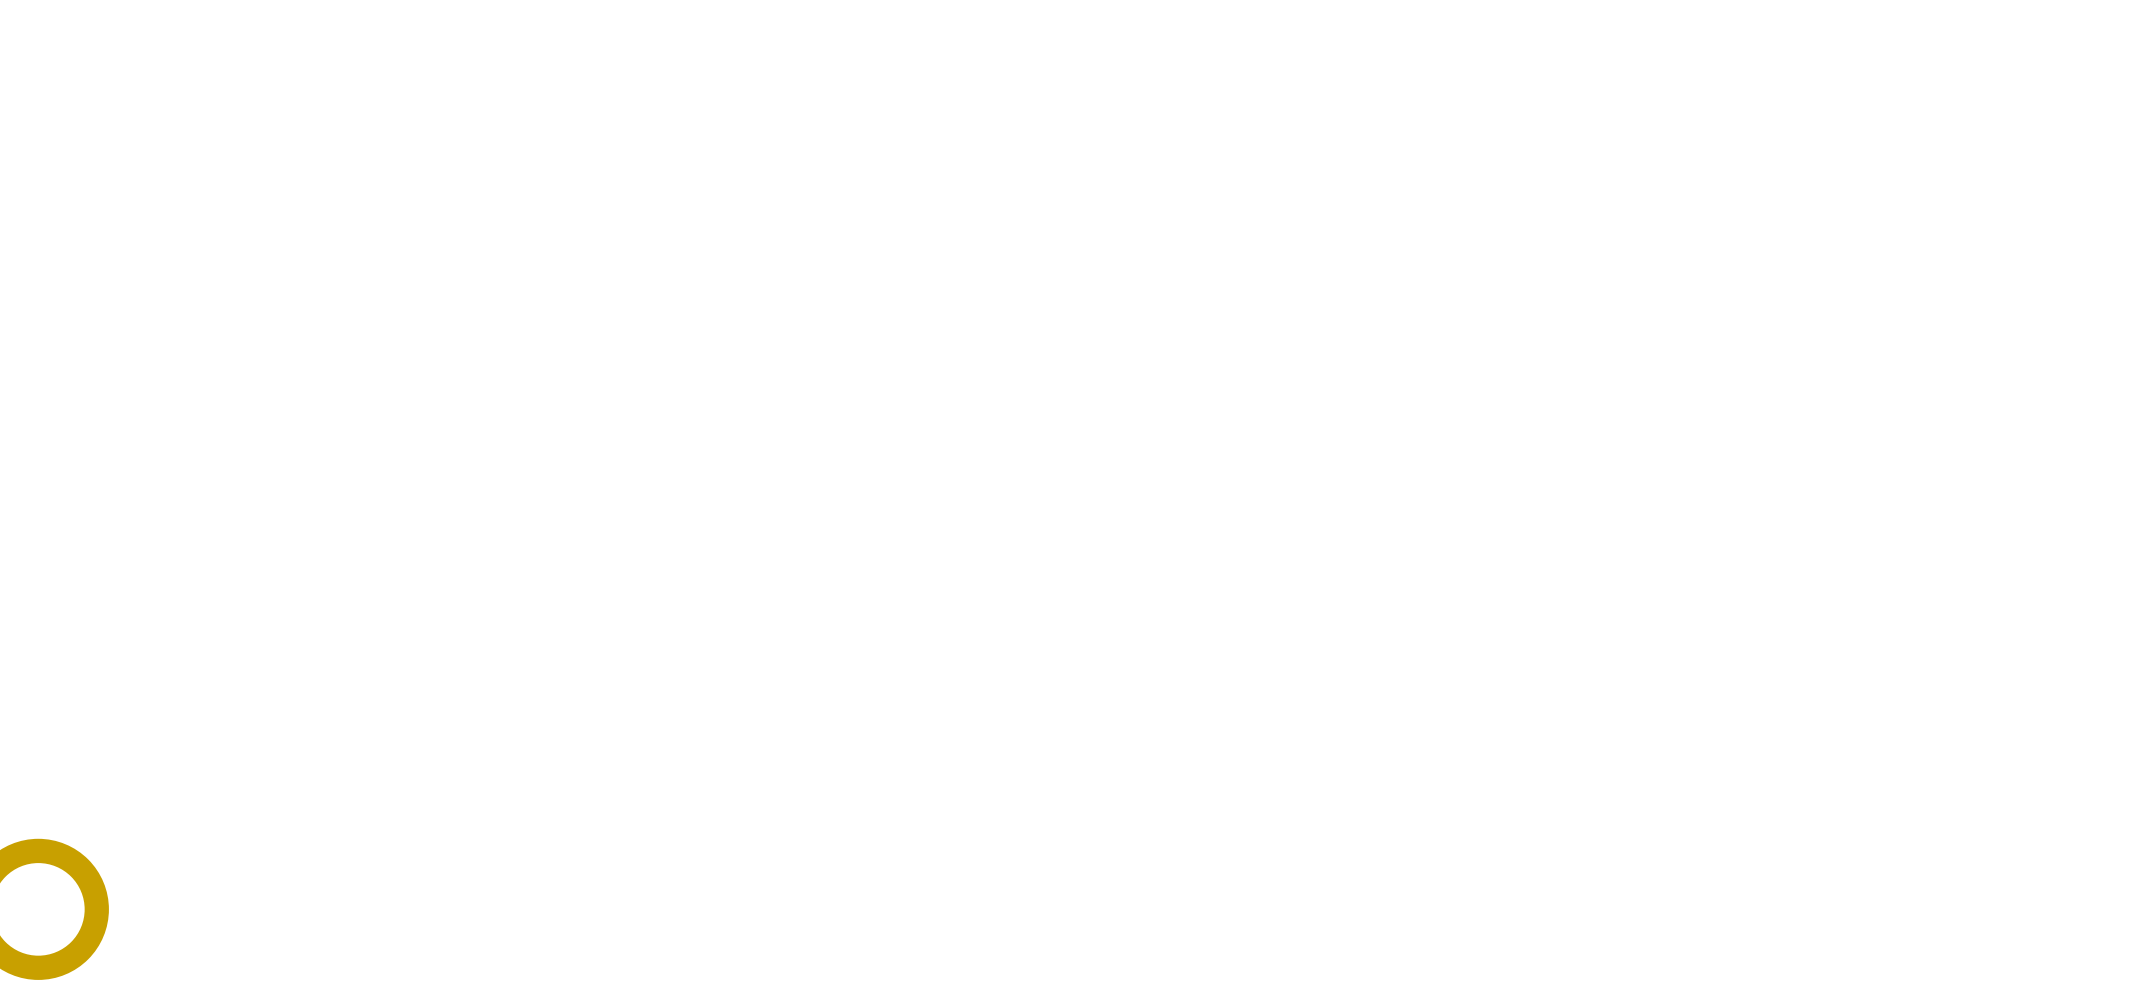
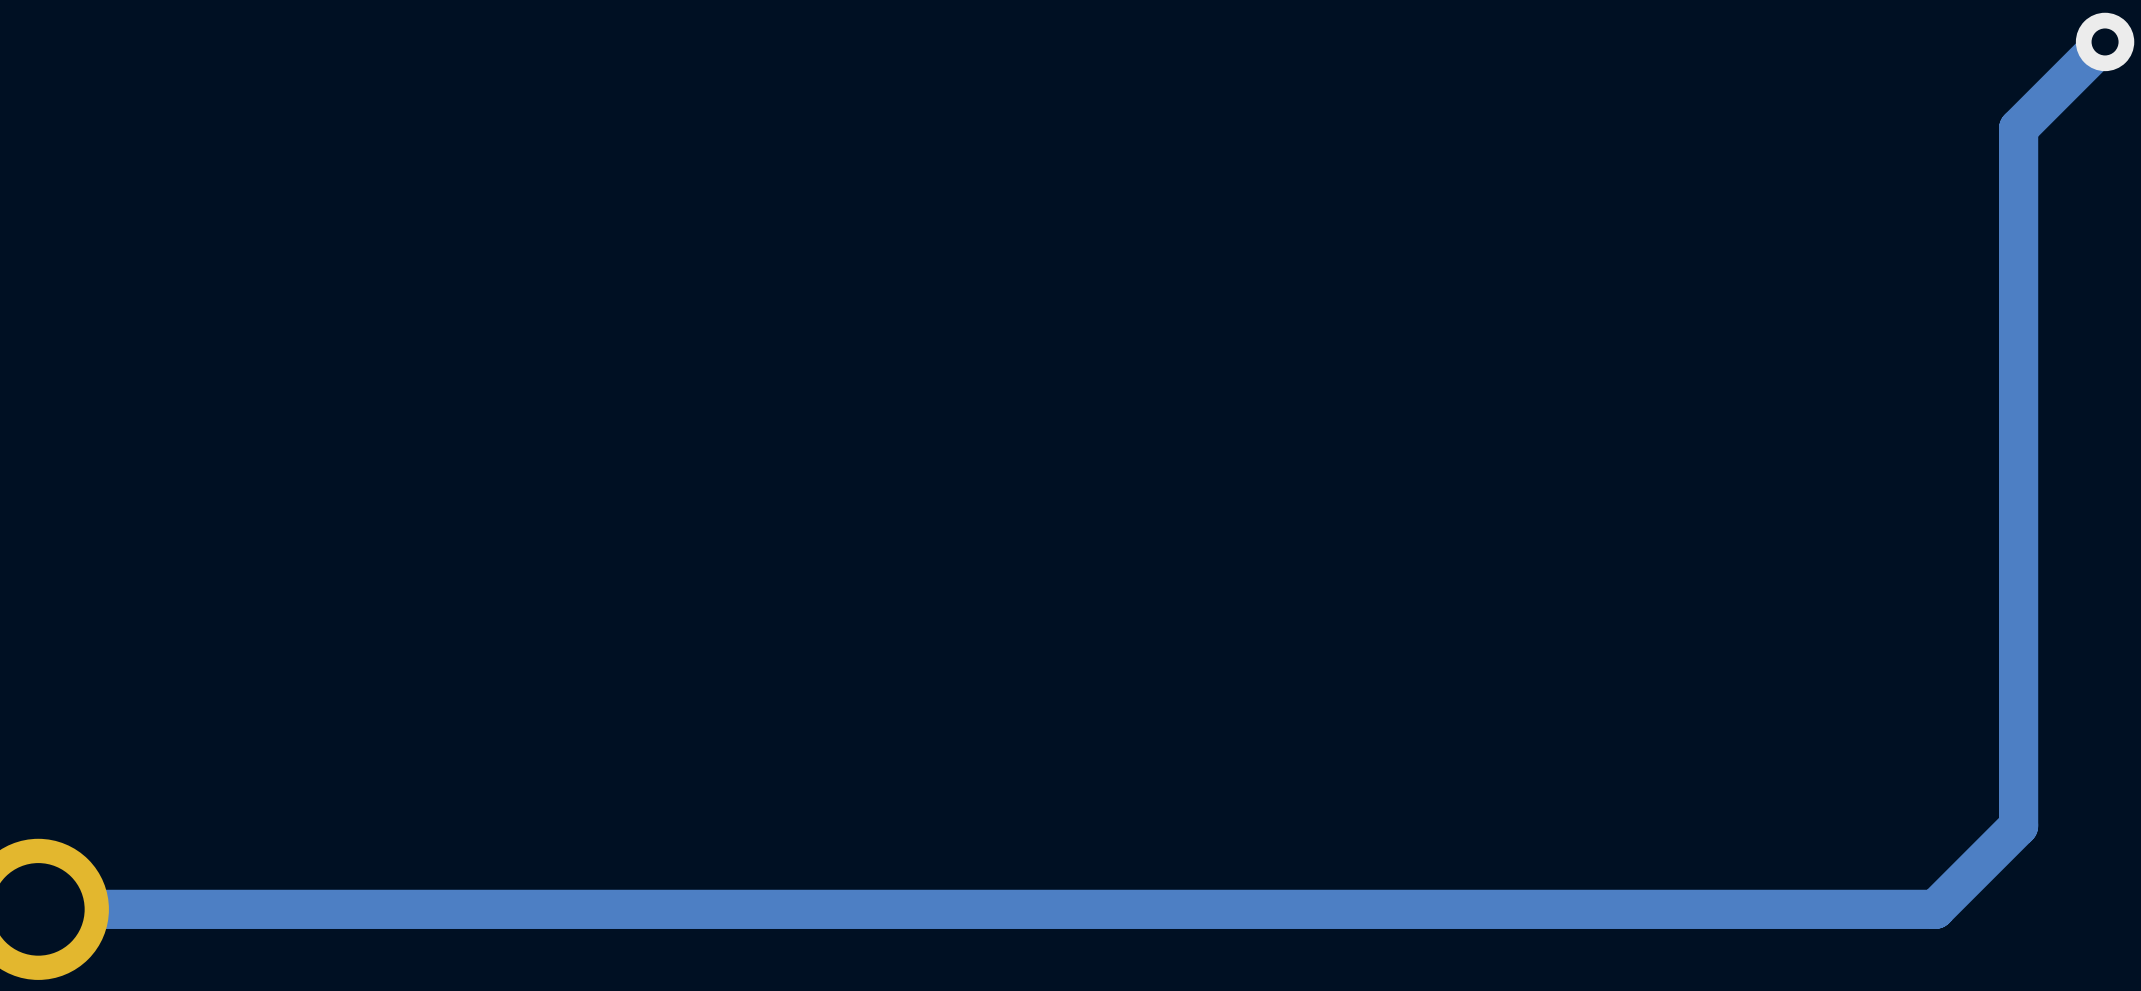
track: none -> (2105, 41) (2018, 128) (2018, 826) (1935, 909) (38, 909)
via: none -> (2105, 41)

